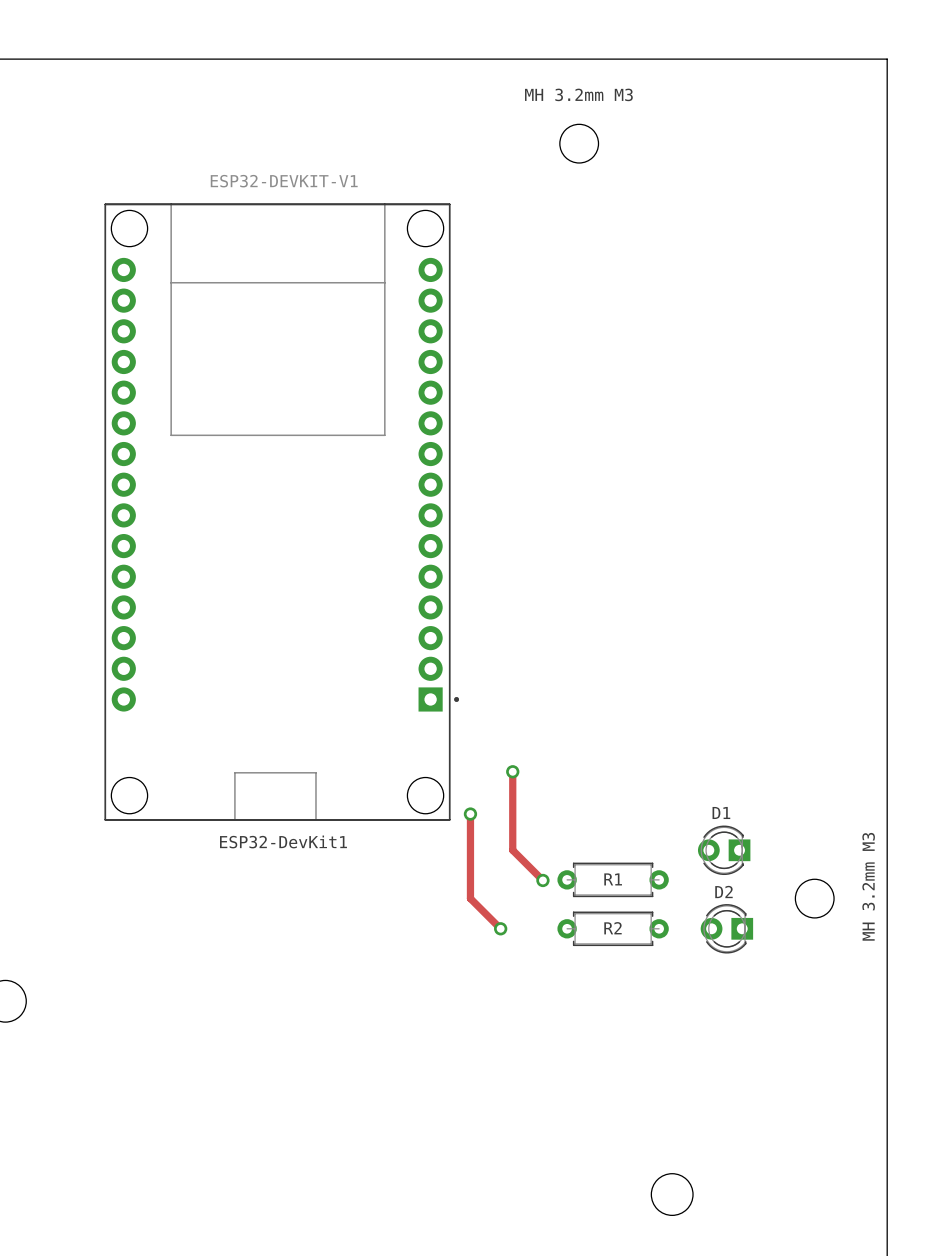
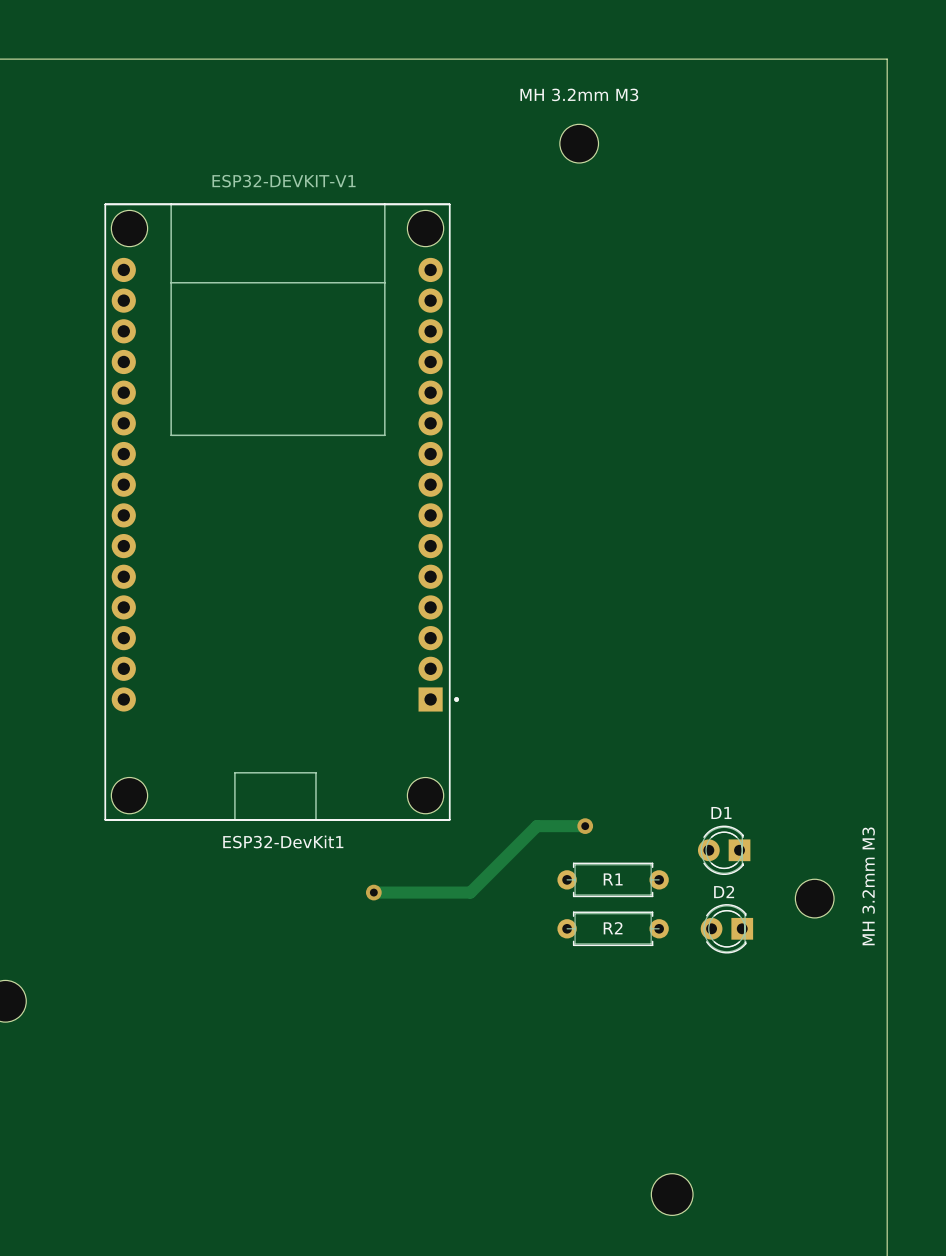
track: (512, 771) (512, 850) (542, 880) -> none
via: (512, 771) -> none
track: (470, 814) (470, 898) (500, 928) -> none
via: (470, 814) -> none
track: none -> (585, 826) (536, 826) (470, 892) (373, 892)
via: none -> (585, 826)
via: (542, 880) -> none
via: none -> (373, 892)
via: (500, 928) -> none

